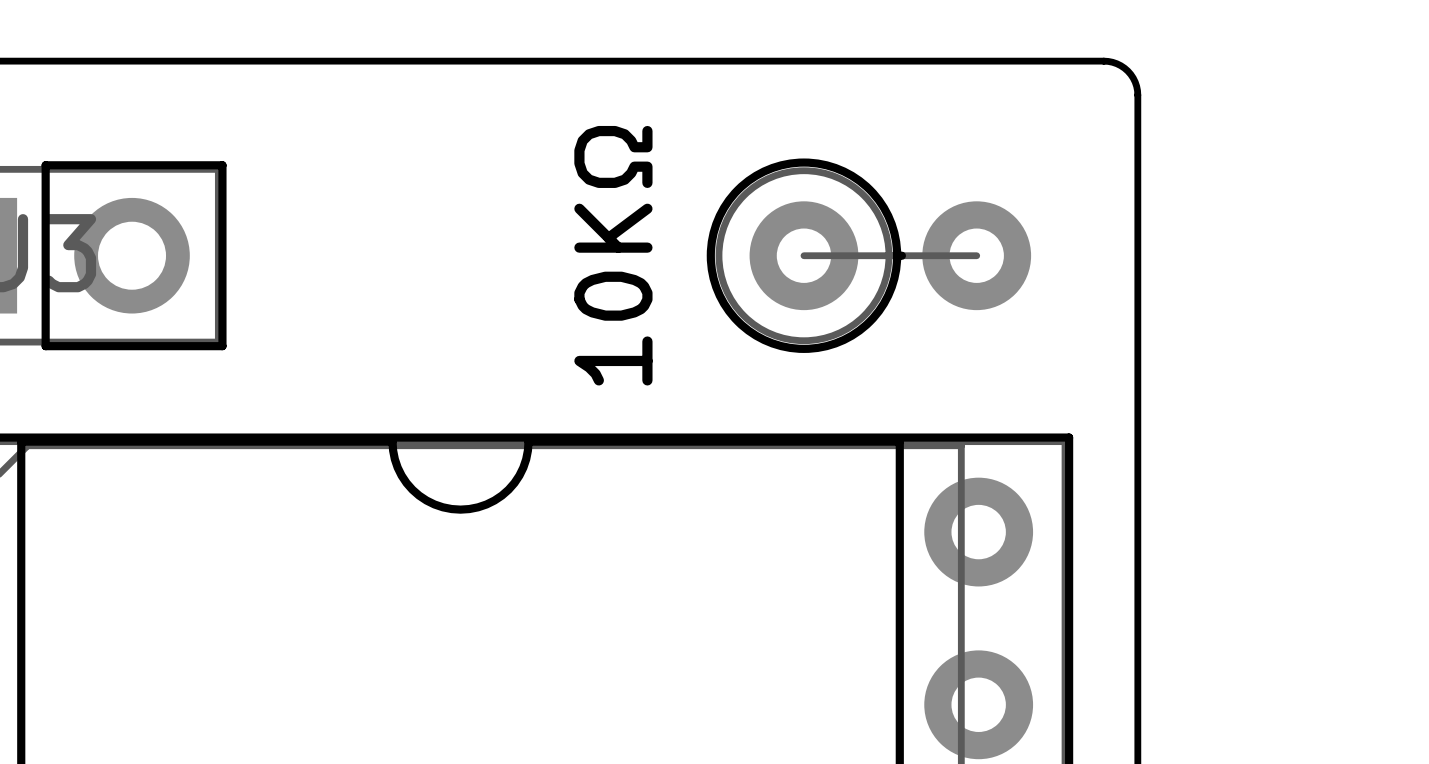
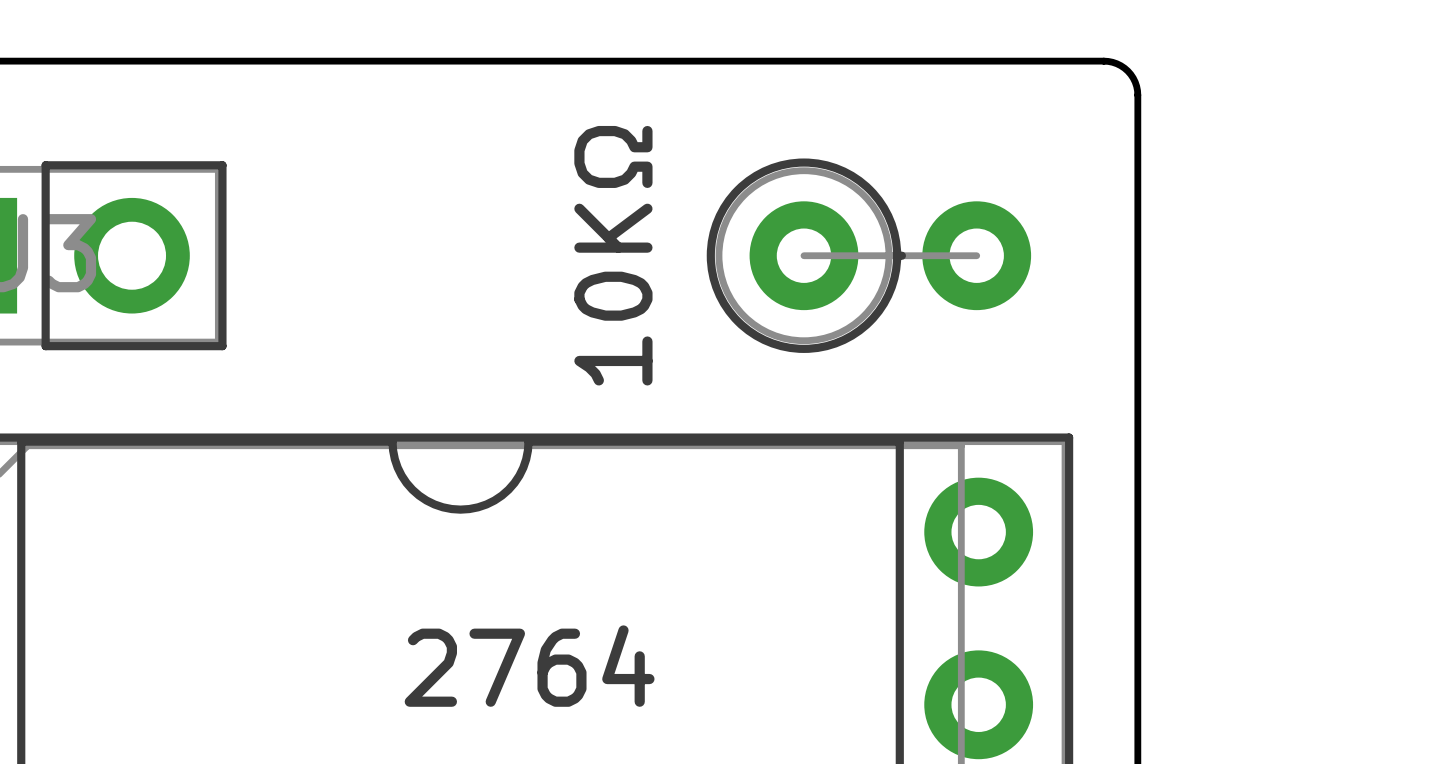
part value: none -> 2764 (529, 666)

